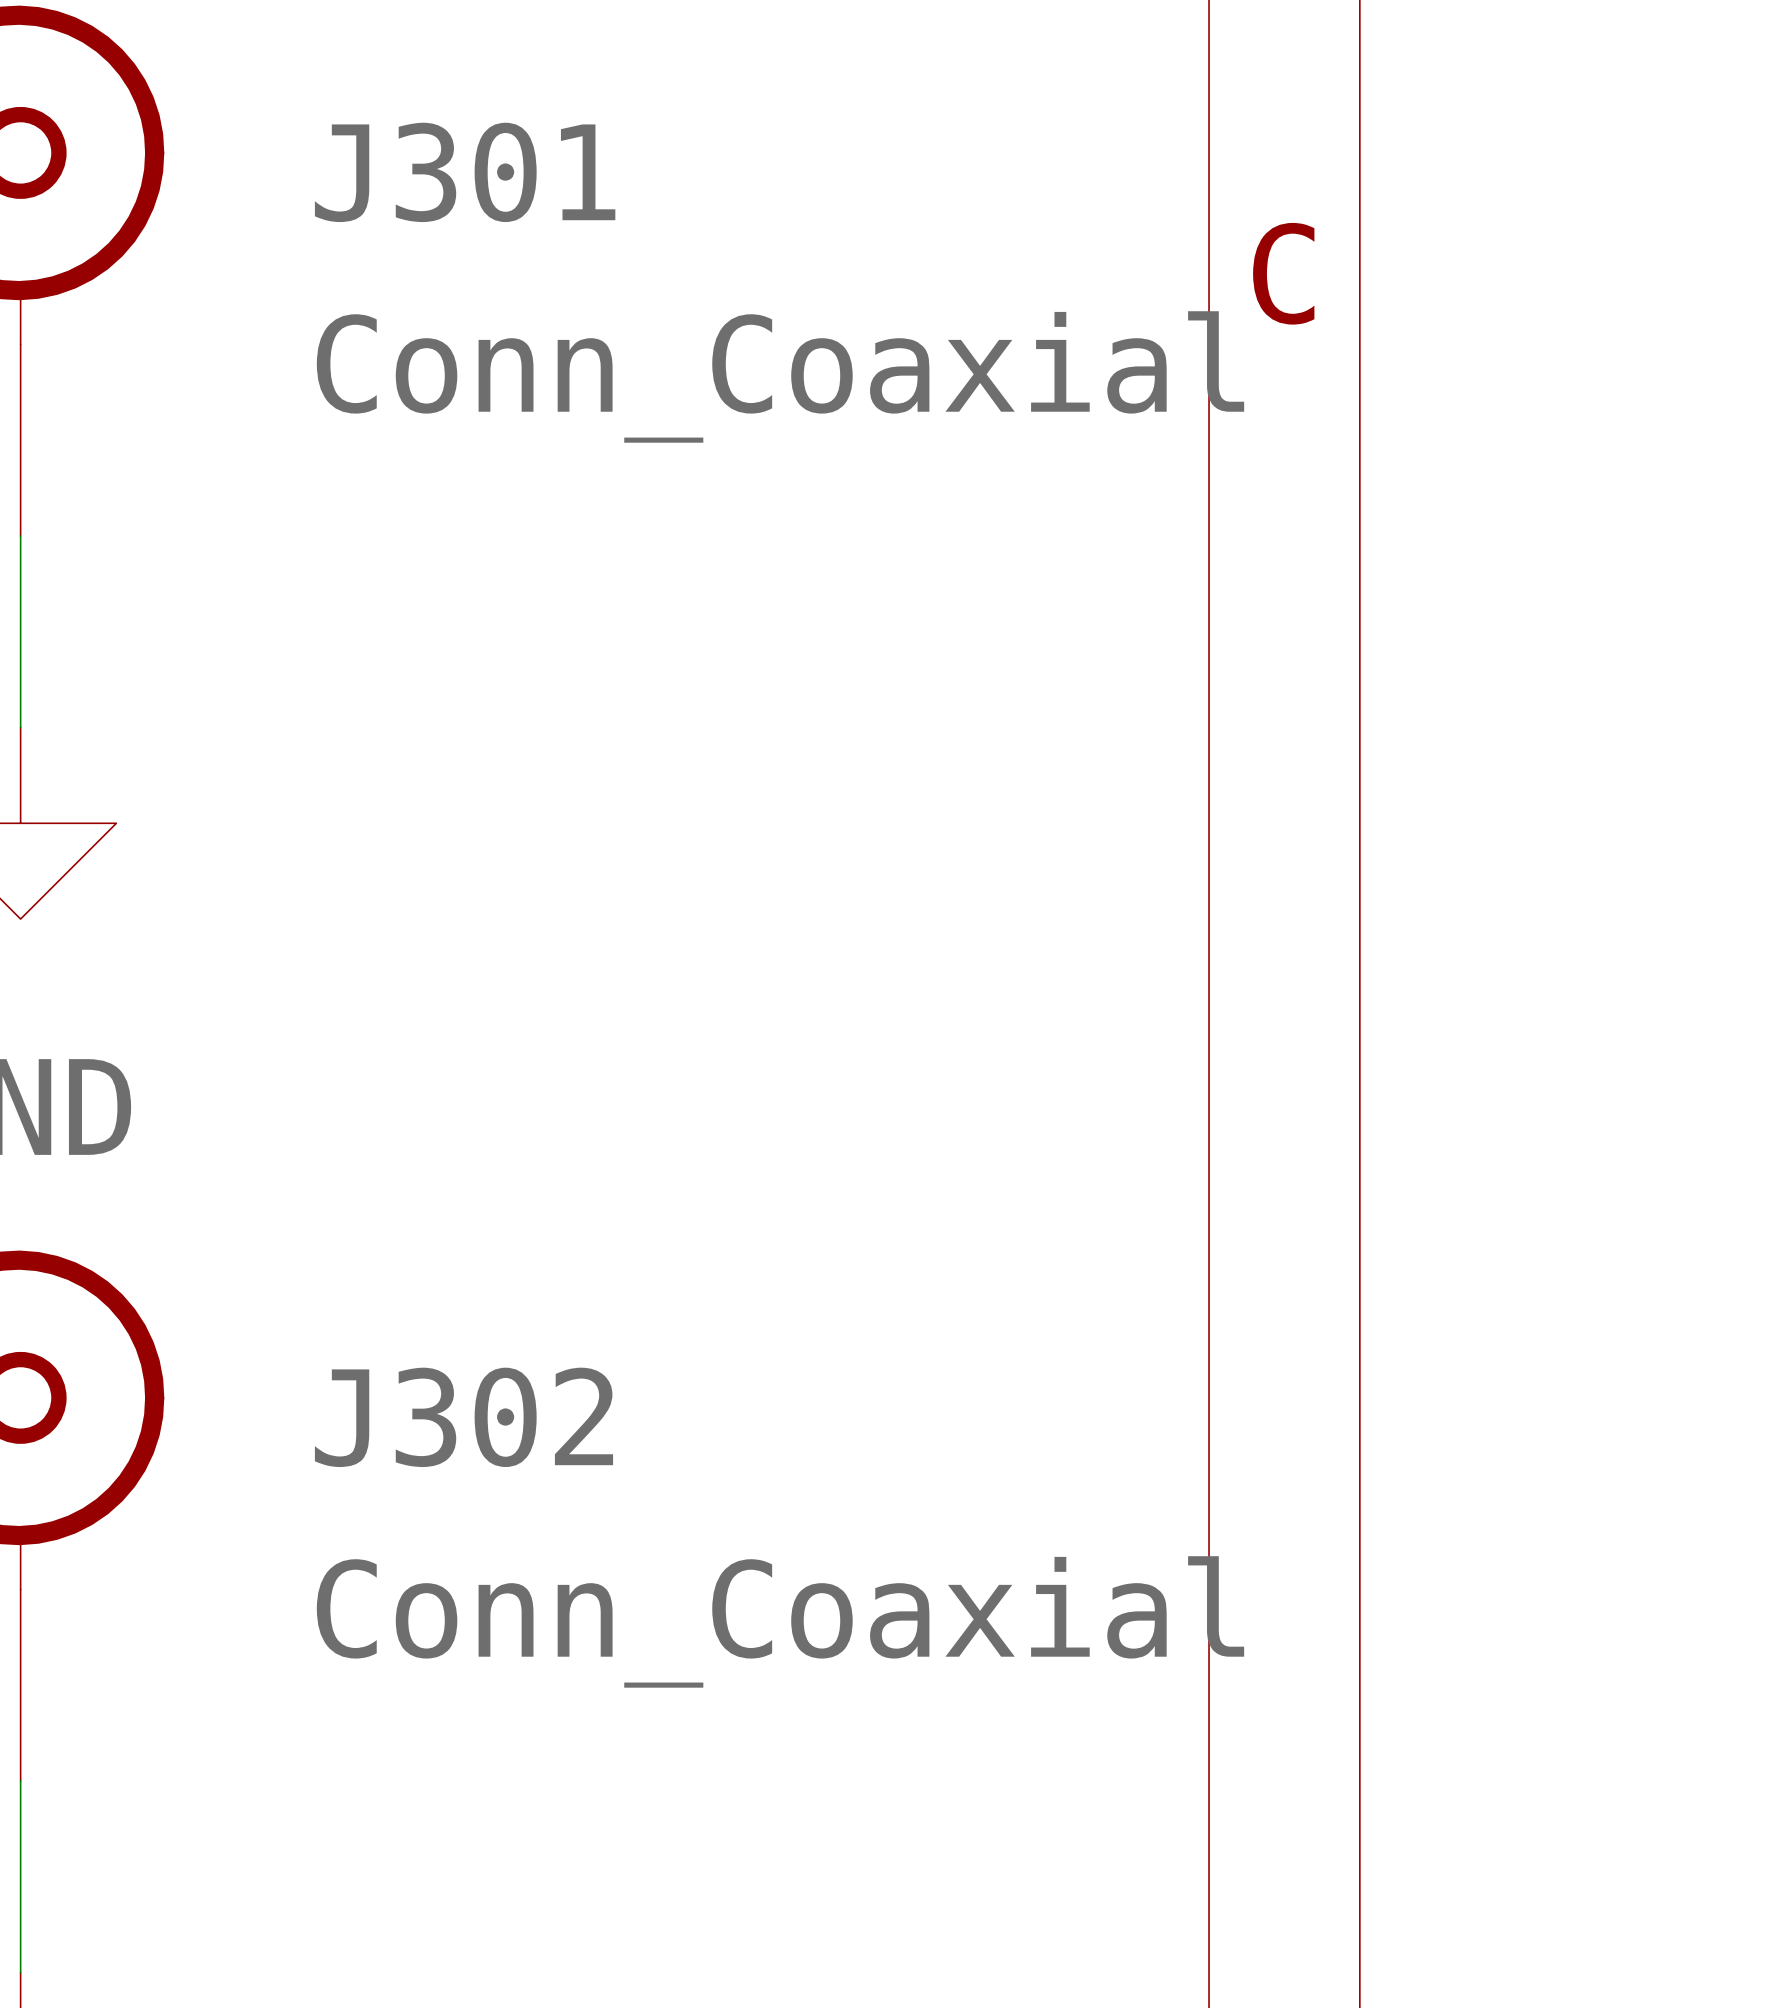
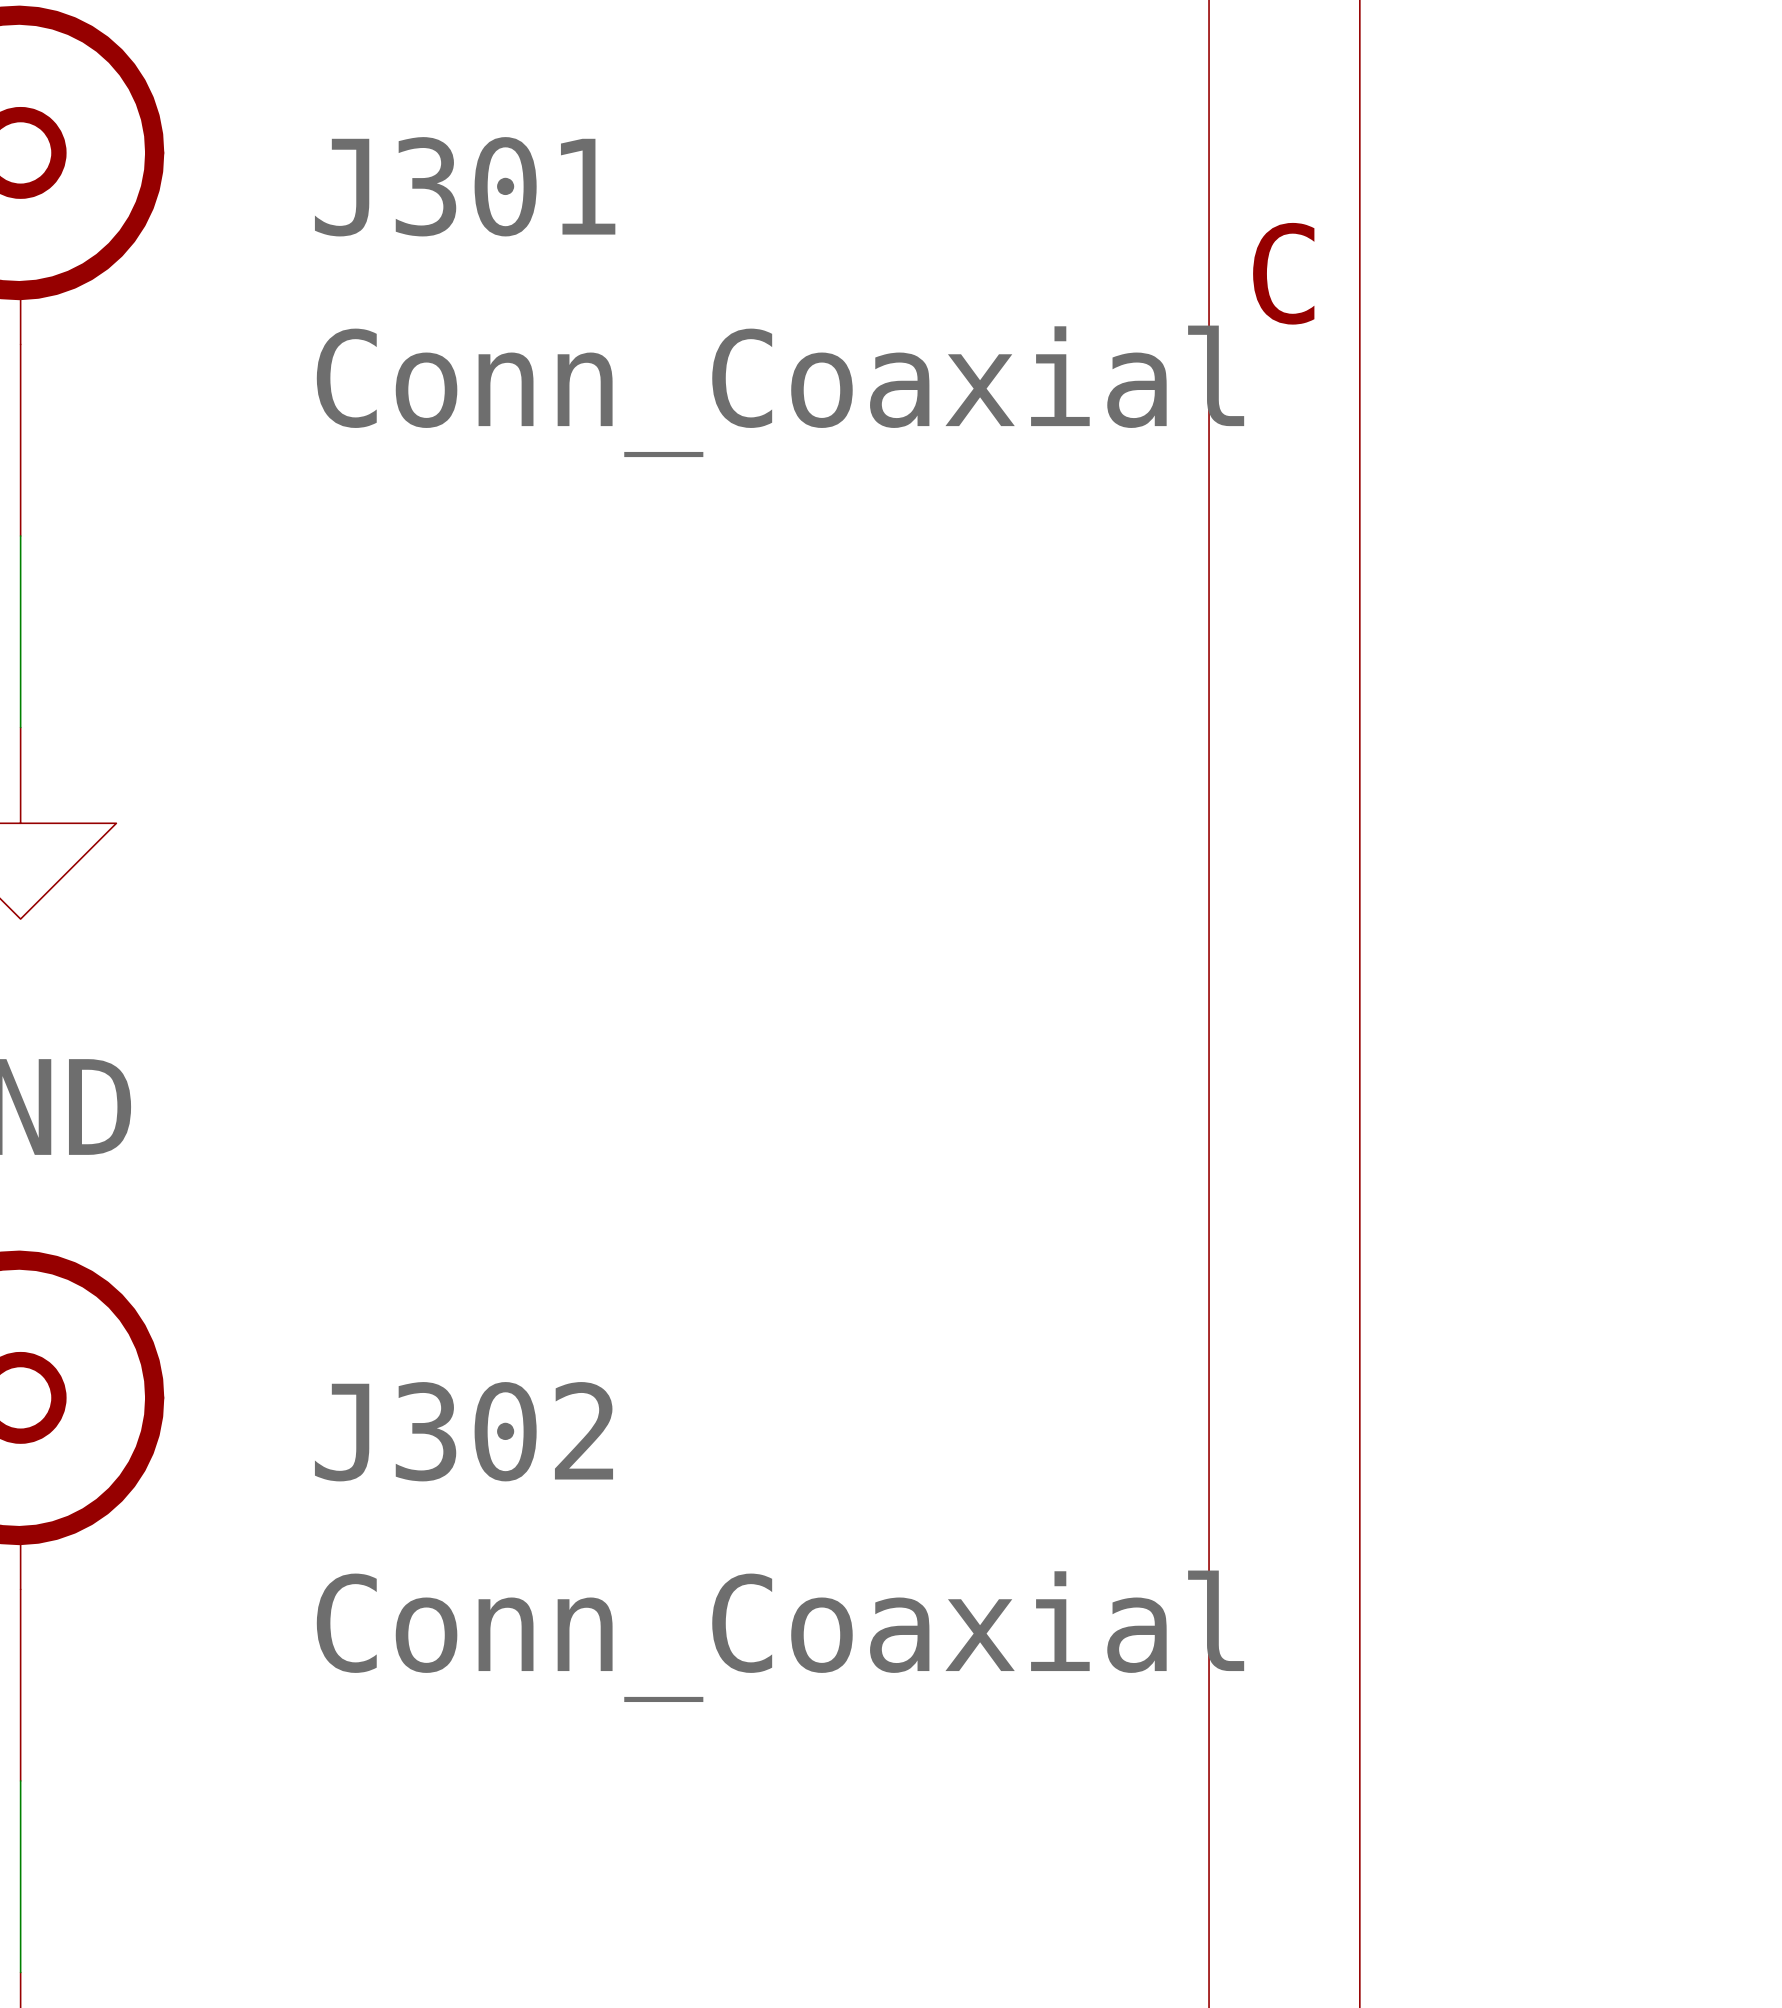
J301 name position: J301 (465, 172) -> J301 (465, 186)
J301 value position: Conn_Coaxial (780, 376) -> Conn_Coaxial (780, 391)
J302 name position: J302 (464, 1417) -> J302 (464, 1431)
J302 value position: Conn_Coaxial (780, 1621) -> Conn_Coaxial (780, 1636)

